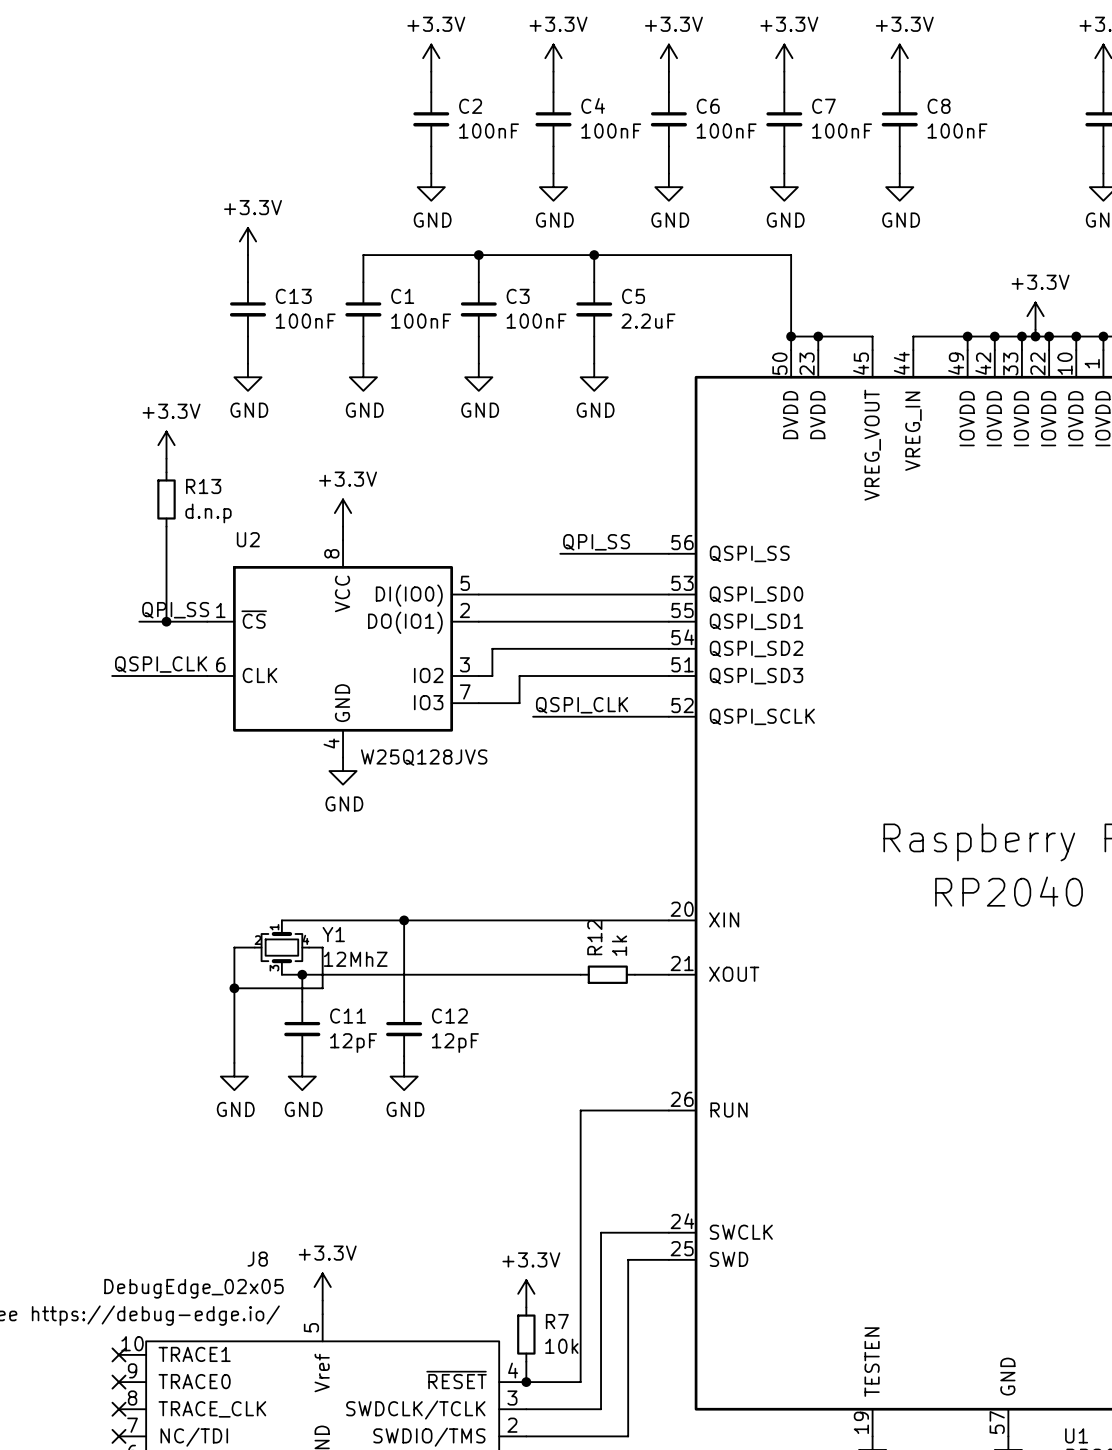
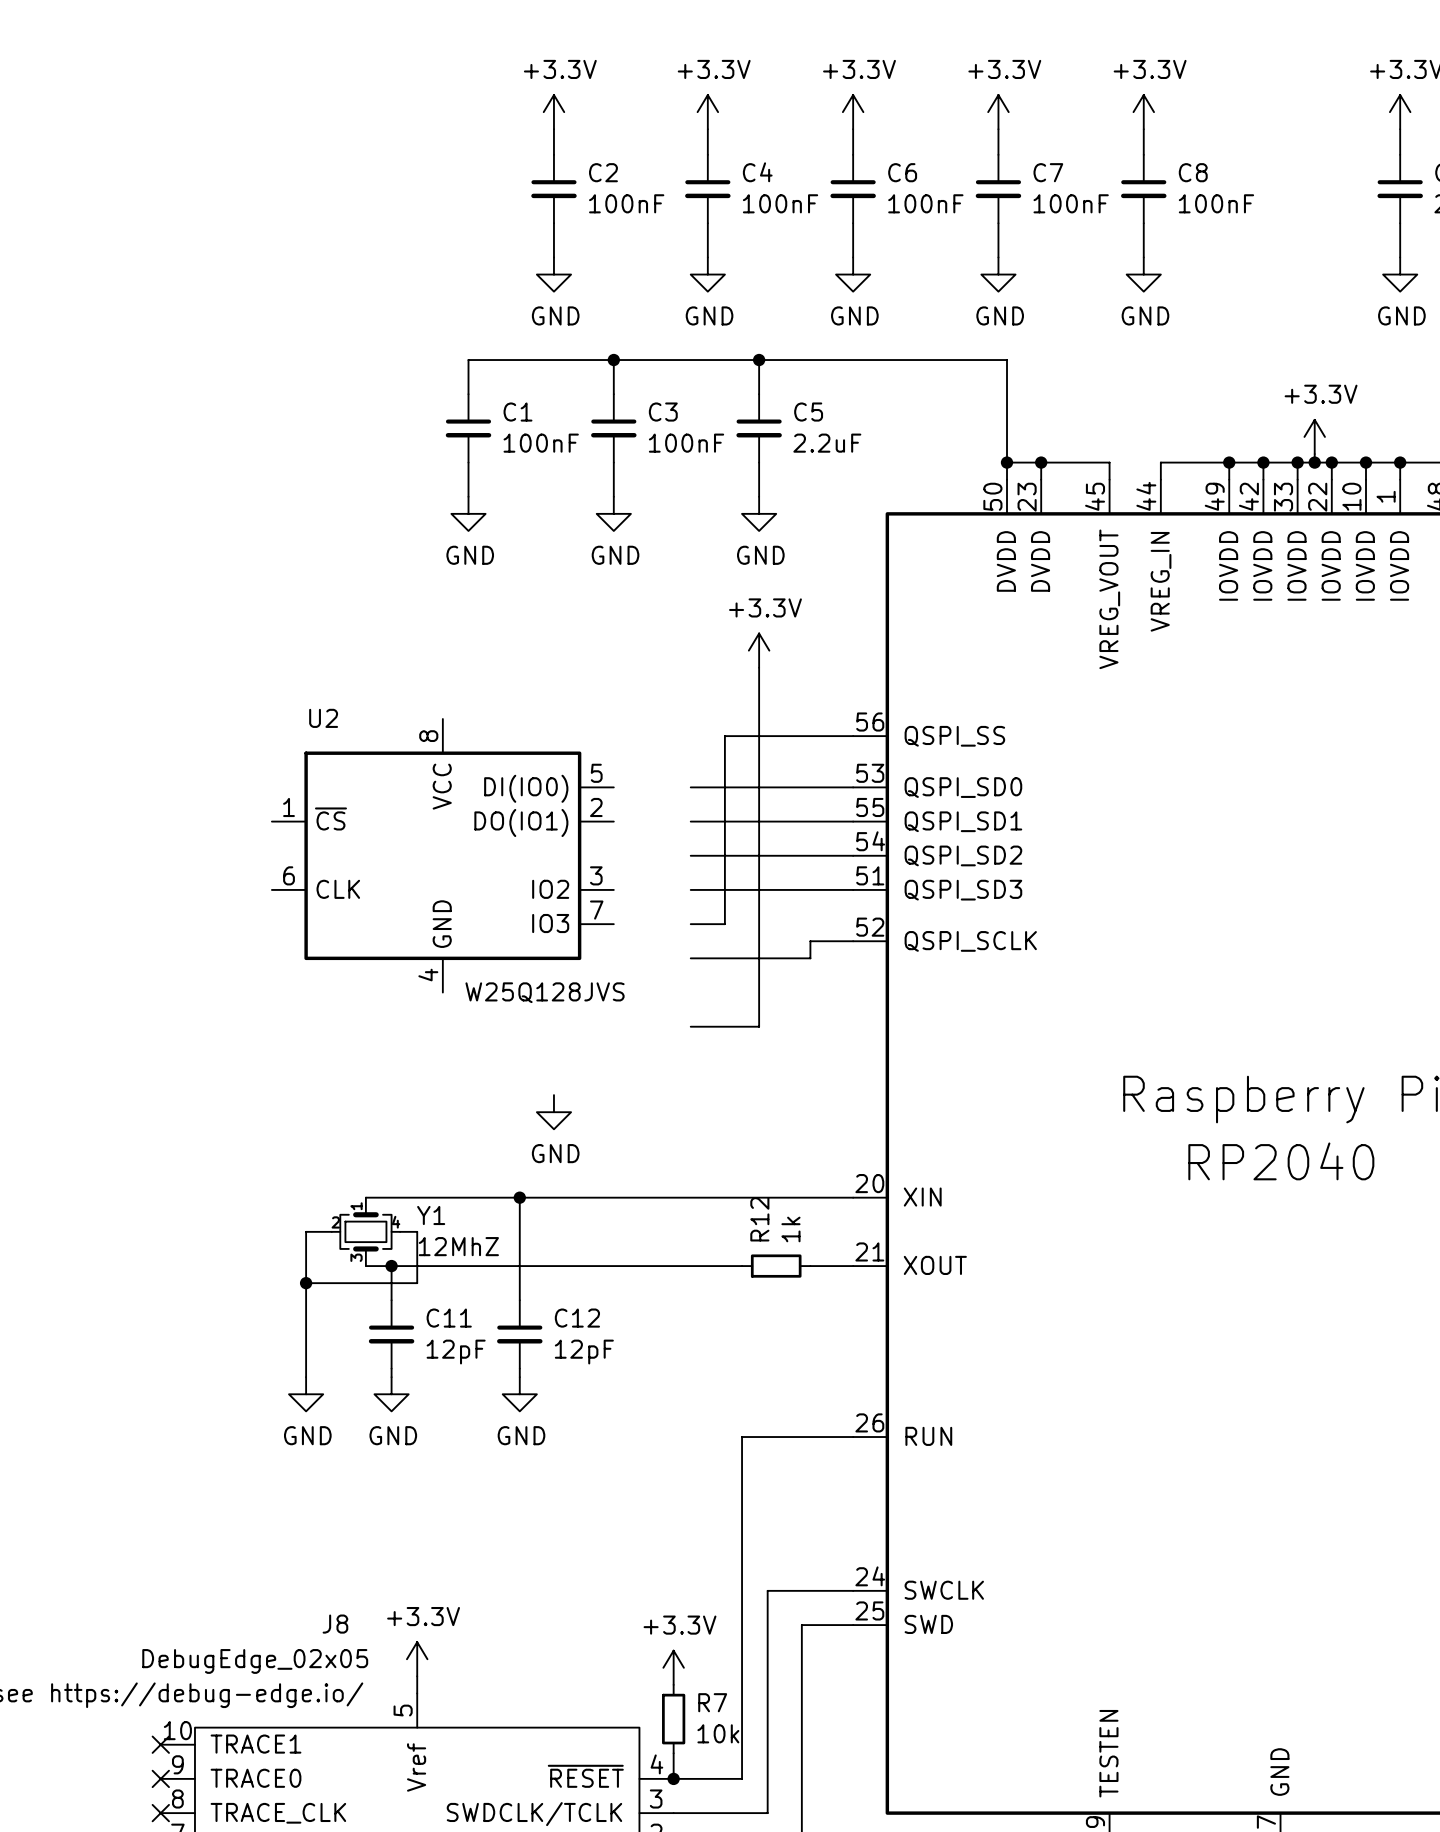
power symbol: +3.3V (247, 241) -> none
wire: (247, 255) (247, 282) -> none
C13: 100nF (247, 309) -> none
wire: (247, 336) (247, 363) -> none
power symbol: GND (247, 377) -> none
power symbol: +3.3V (166, 445) -> none
wire: (166, 458) (166, 472) -> none
power symbol: none -> +3.3V (759, 650)
R13: d.n.p (166, 499) -> none
wire: none -> (759, 667) (759, 1026) (690, 1026)
power symbol: +3.3V (343, 513) -> none
wire: (166, 526) (166, 621) -> none
wire: (343, 526) (343, 540) -> none
label: QPI_SS (596, 542) -> none
wire: (560, 553) (567, 553) -> (690, 924) (724, 924) (724, 736)
wire: (478, 594) (539, 594) -> none
label: QPI_SS (175, 610) -> none
wire: (139, 621) (207, 621) -> none
junction: (166, 621) -> none
wire: (478, 621) (539, 621) -> none
wire: (539, 648) (492, 648) (492, 676) (478, 676) -> none
label: QSPI_CLK (161, 664) -> none
wire: (112, 676) (207, 676) -> none
wire: (539, 676) (519, 676) (519, 703) (478, 703) -> none
label: QSPI_CLK (582, 705) -> none
wire: (533, 716) (634, 716) -> (690, 958) (810, 958) (810, 941)
power symbol position: GND (343, 771) -> GND (553, 1112)

